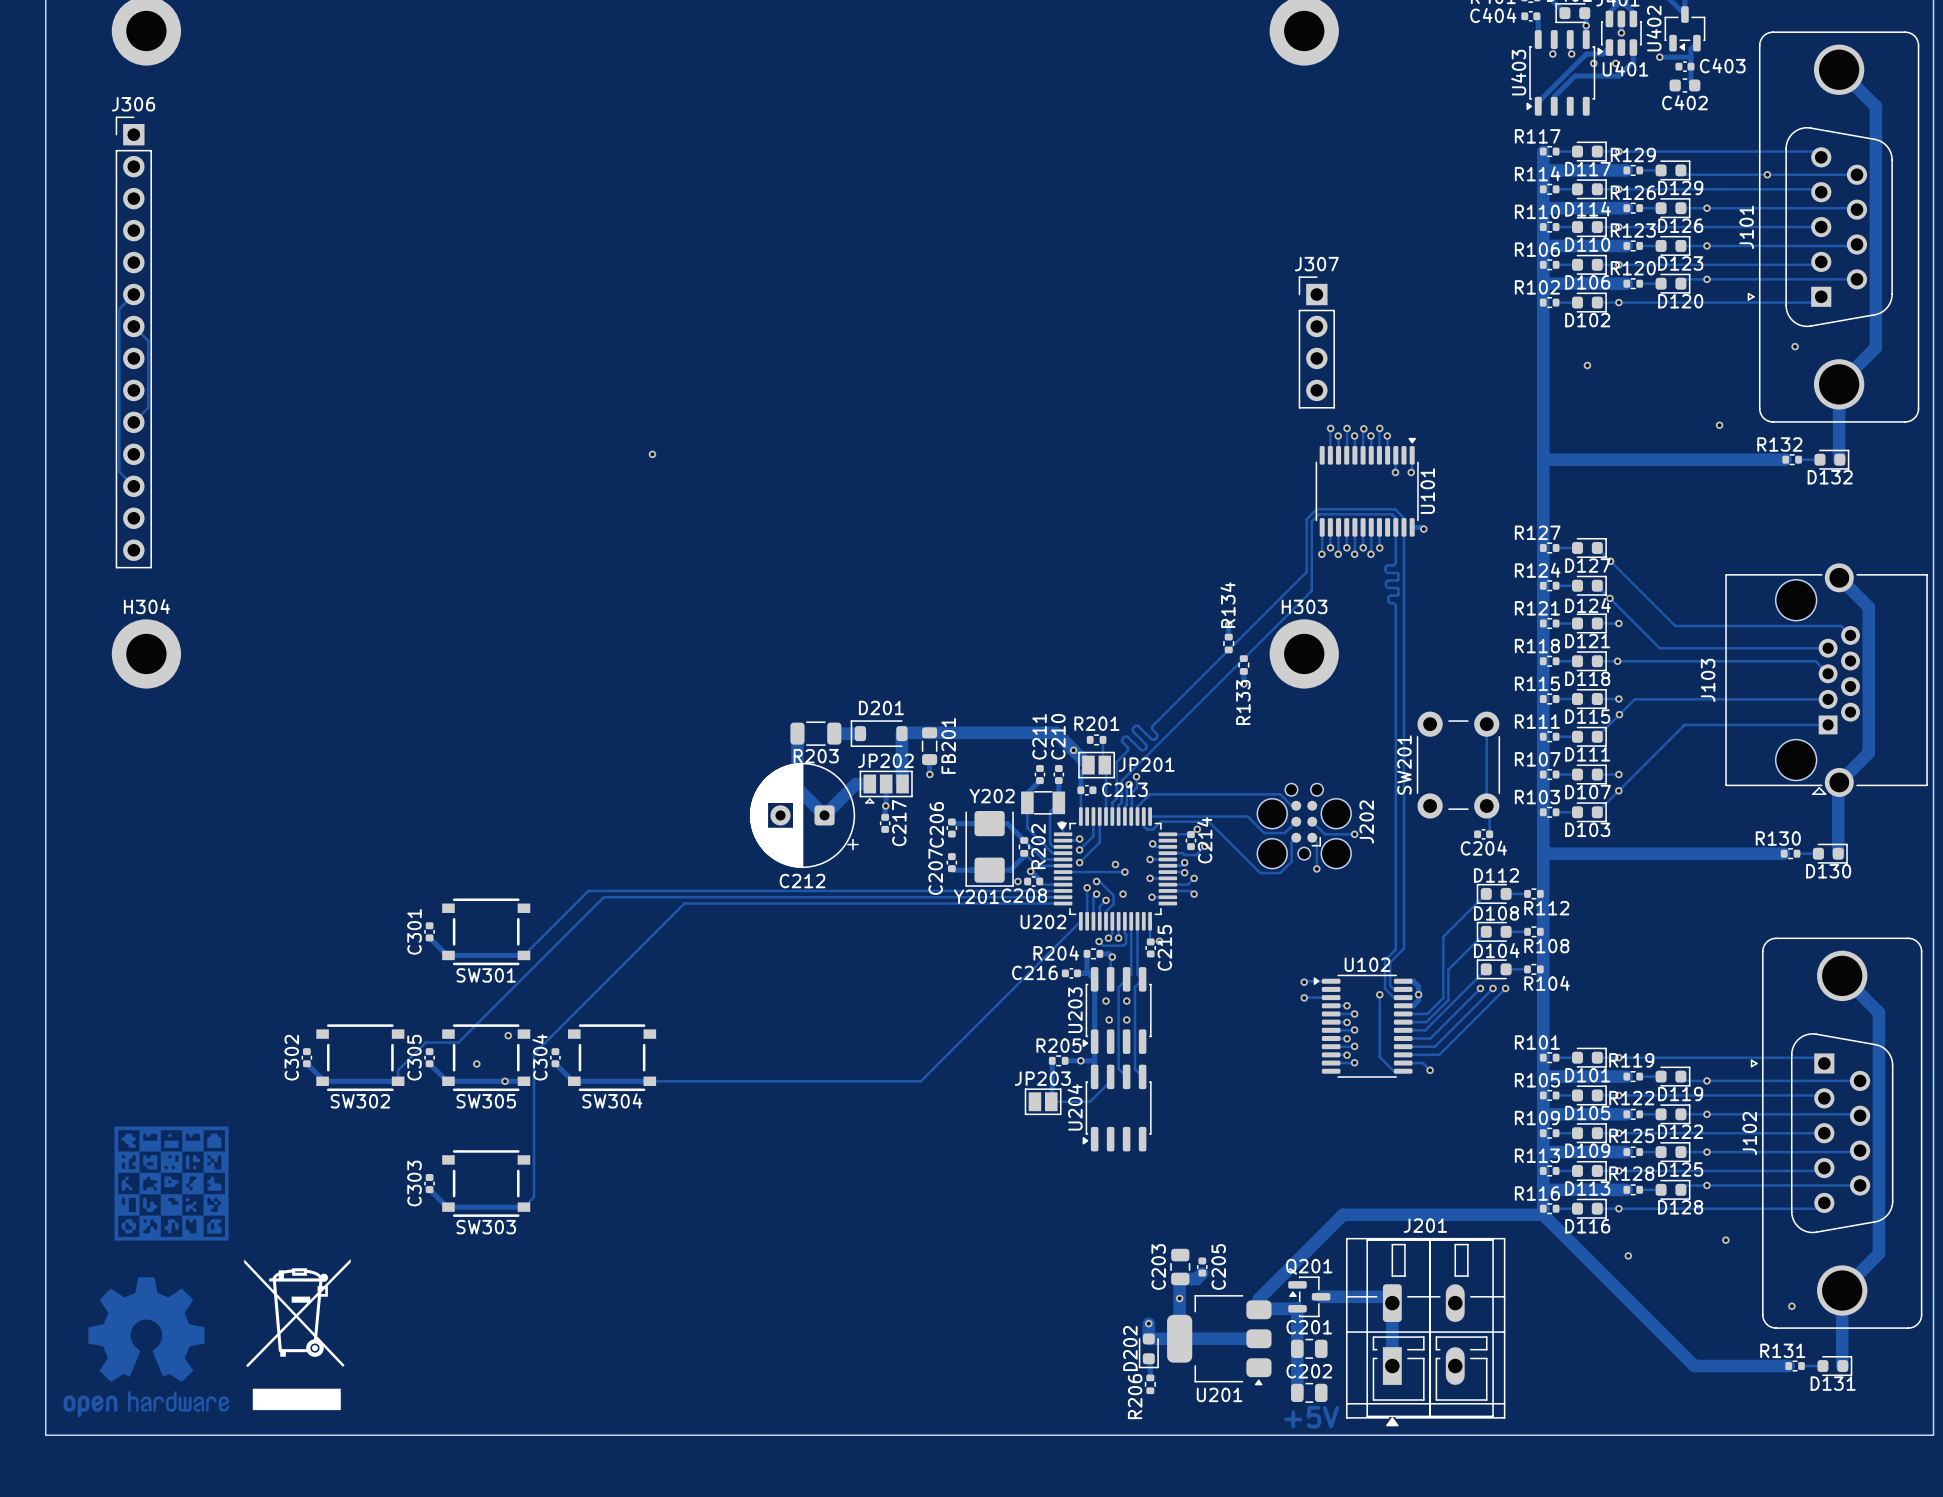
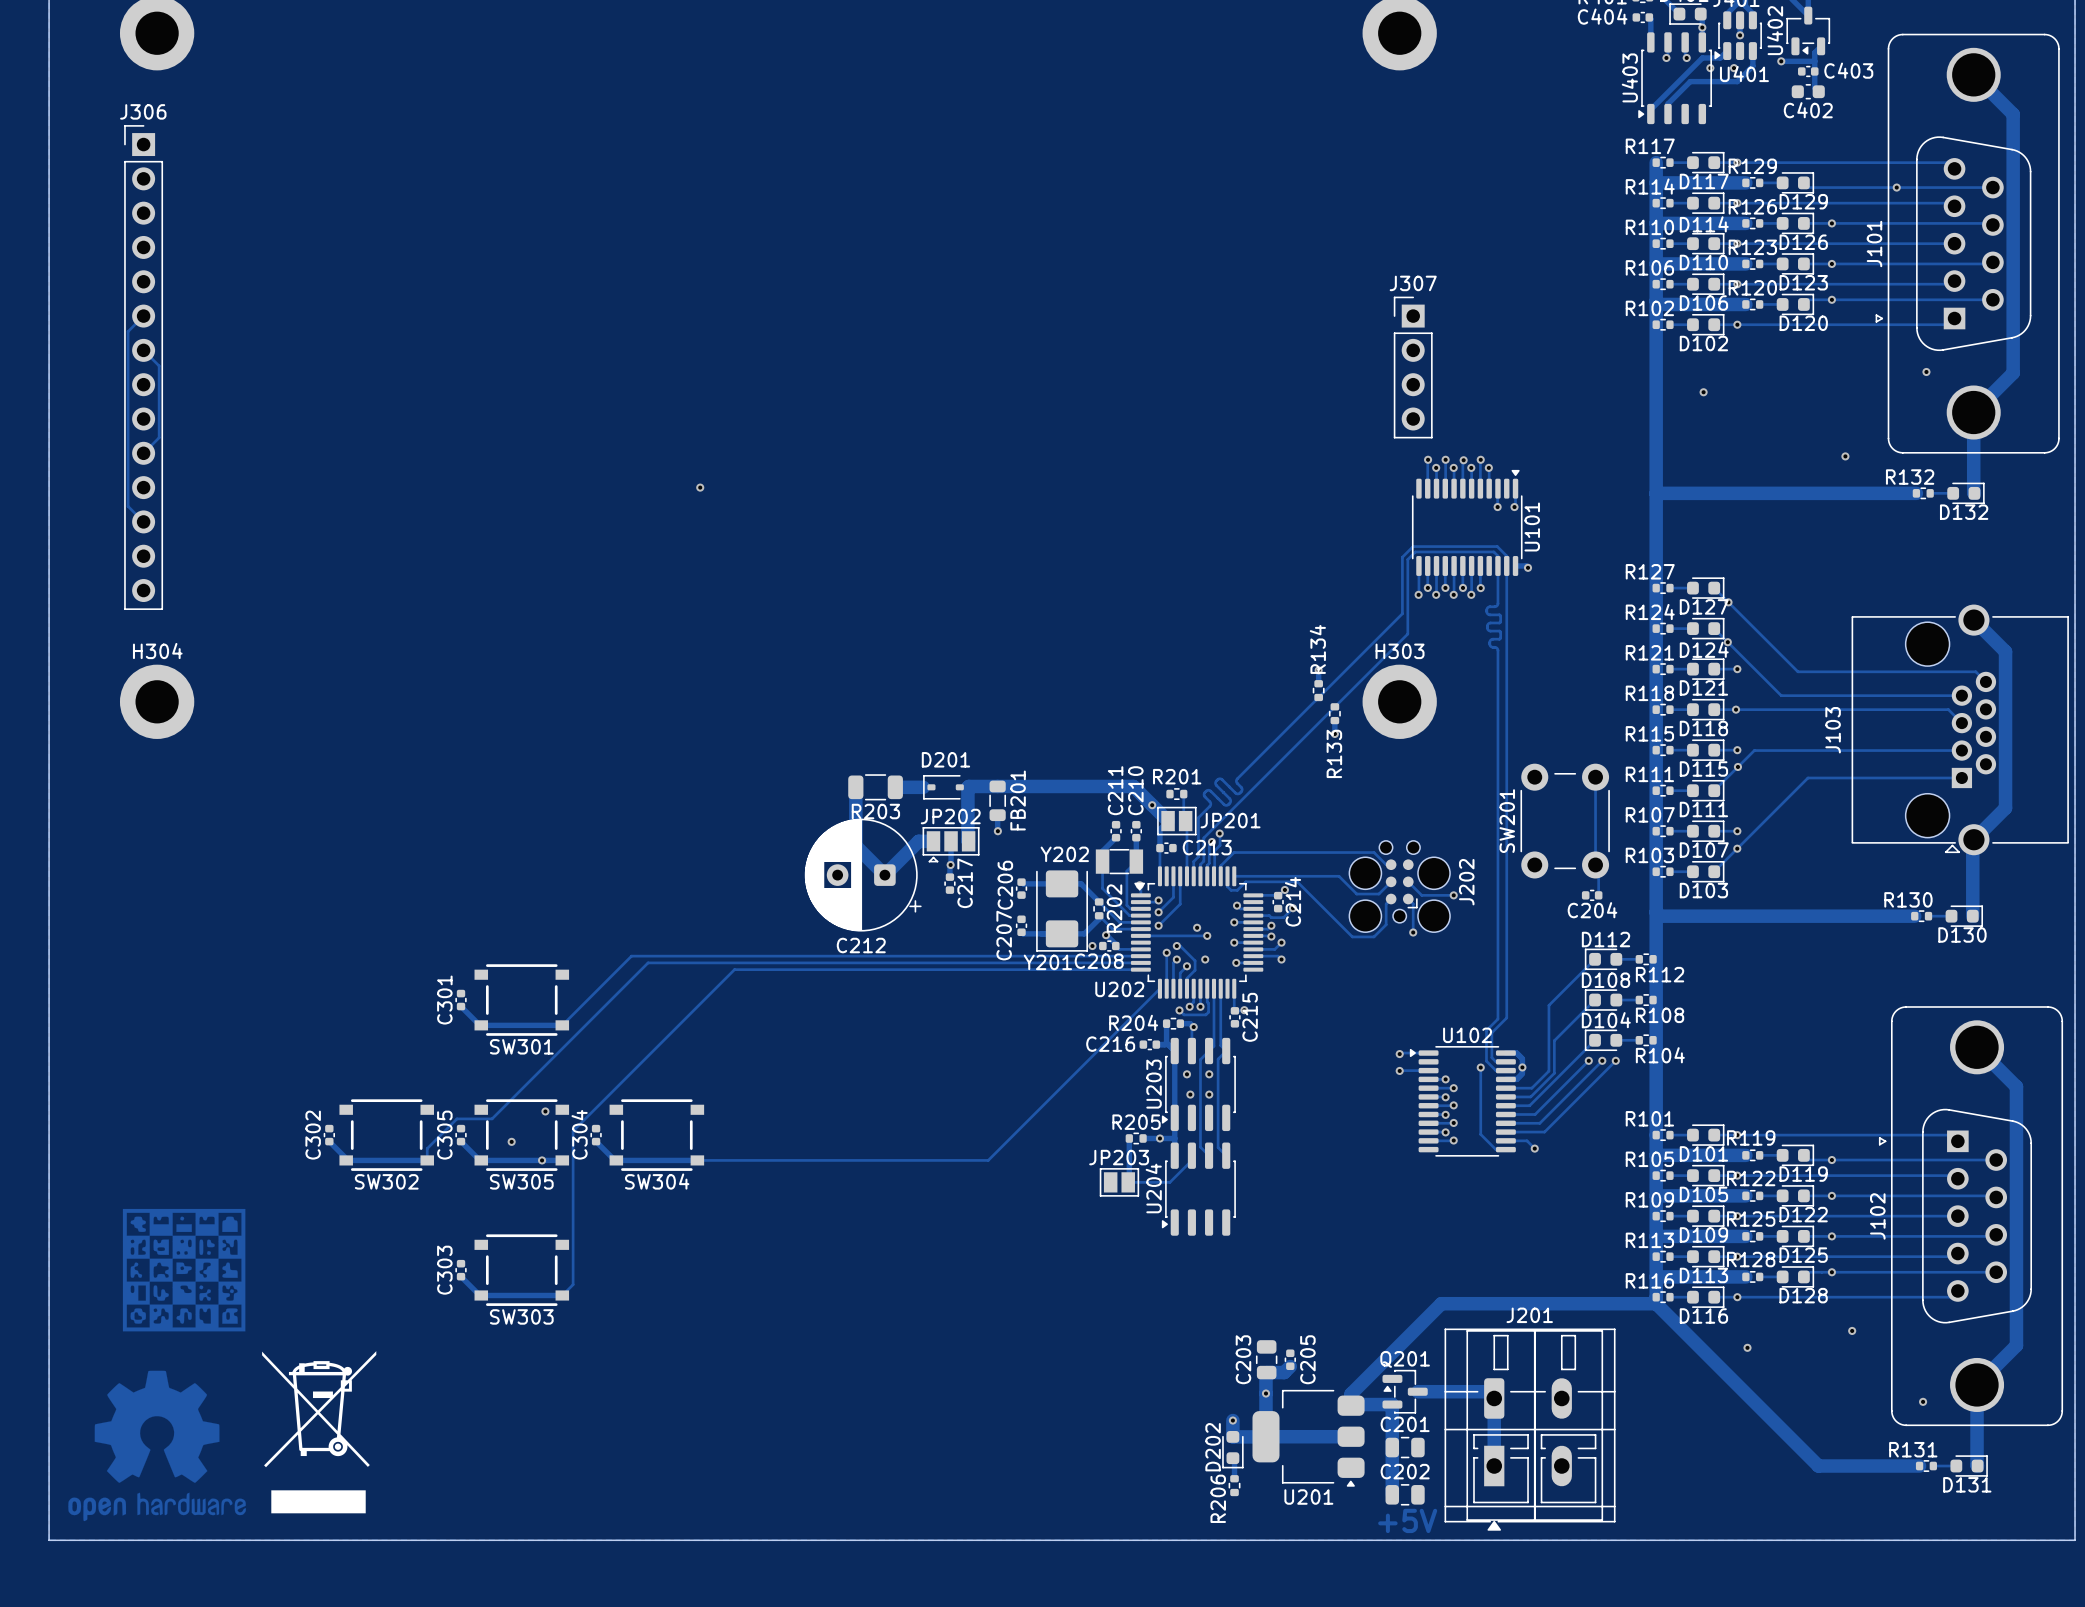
D201 footprint: [850, 720, 908, 747] -> [923, 775, 964, 800]

